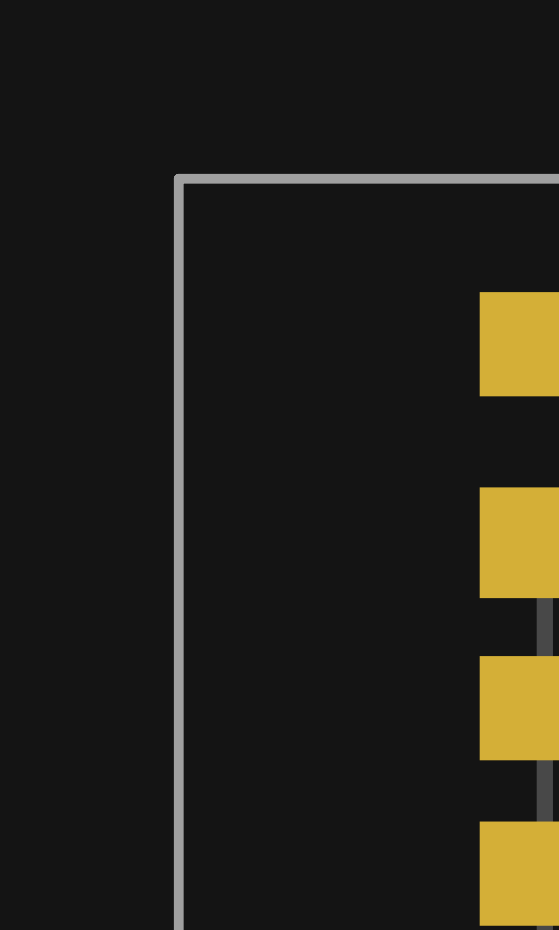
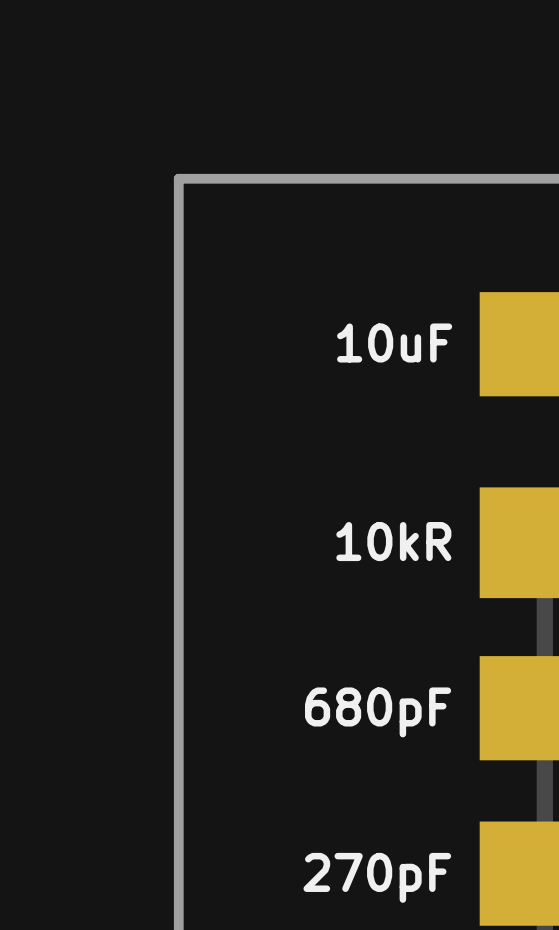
part value: none -> 10uF (394, 342)
part value: none -> 10kR (393, 541)
part value: none -> 680pF (378, 712)
part value: none -> 270pF (377, 877)

